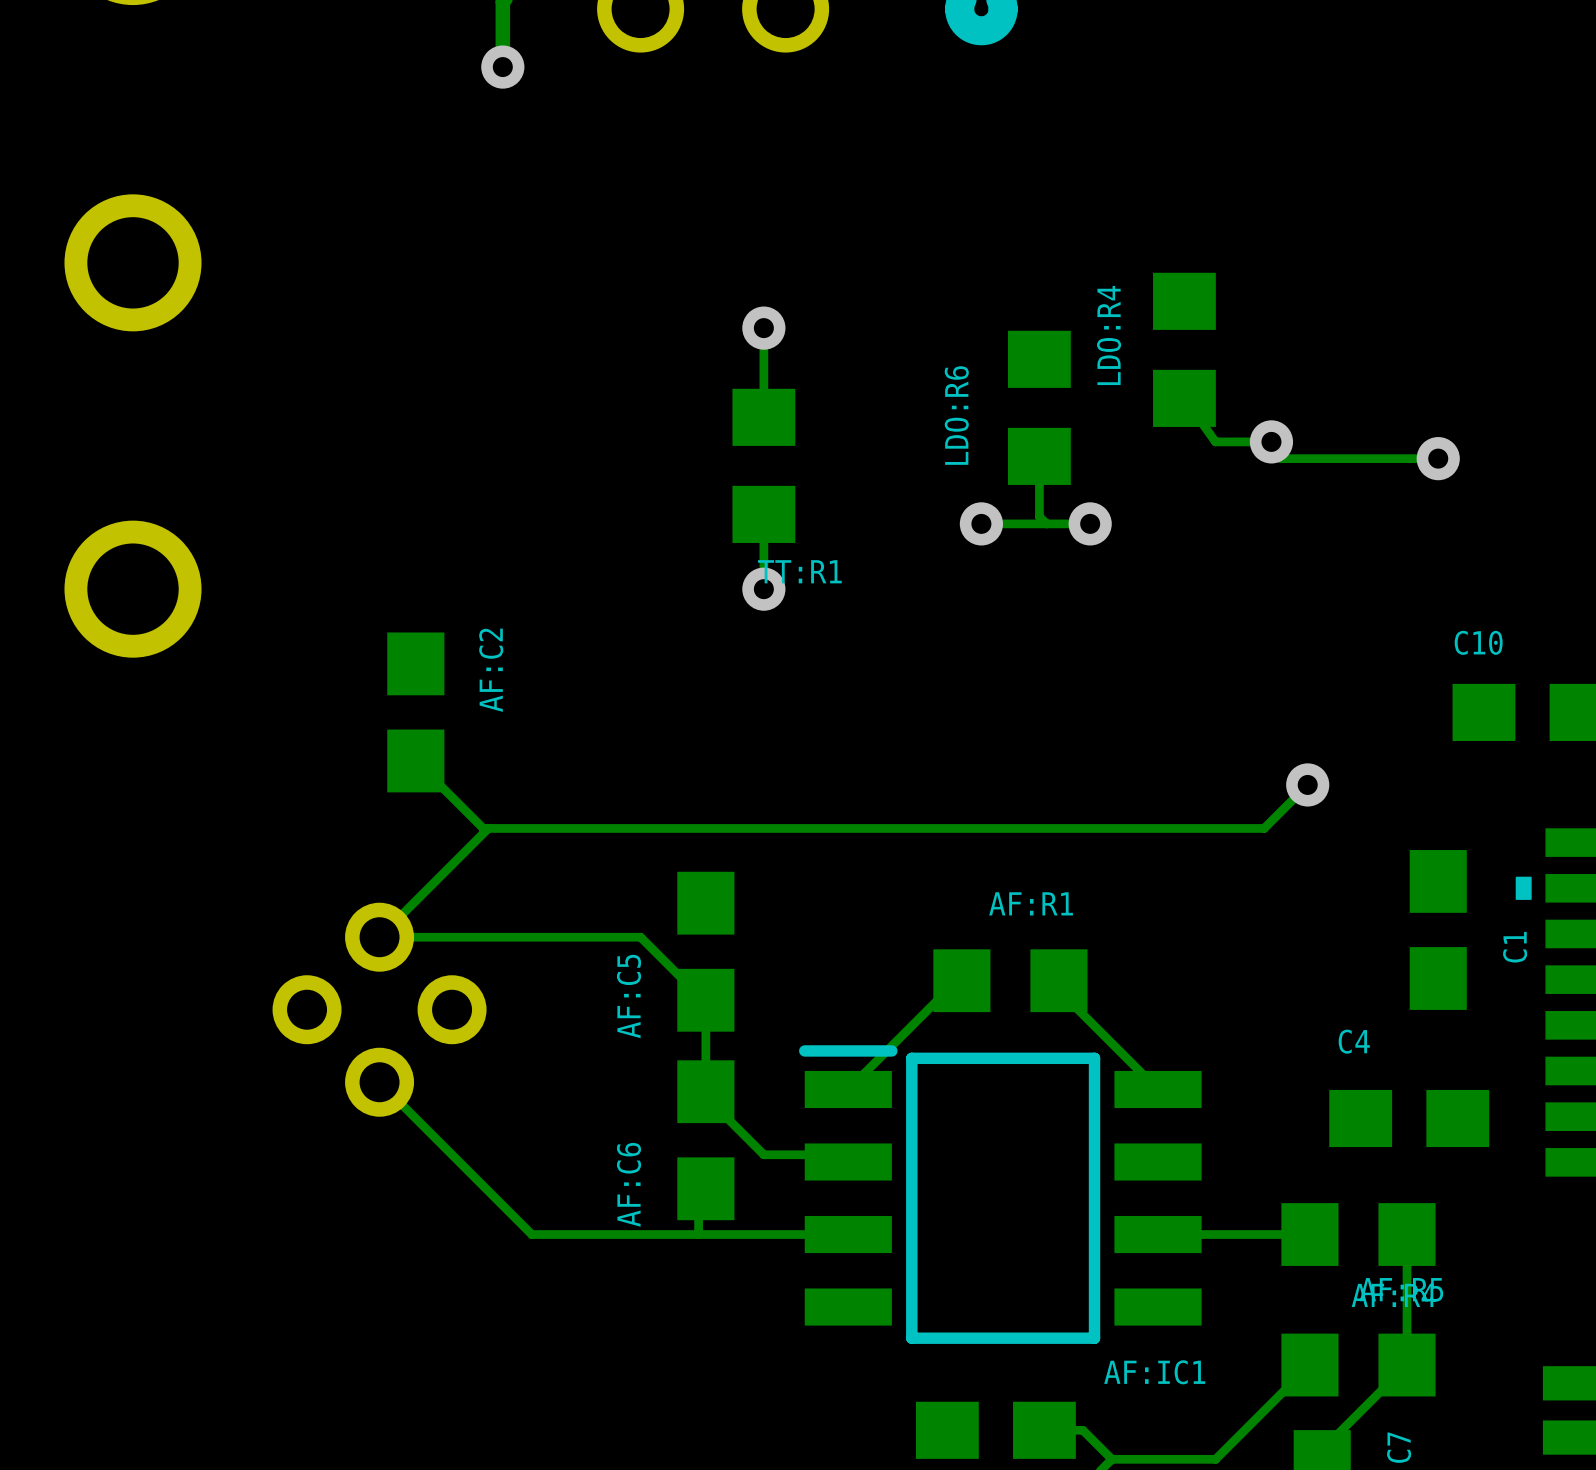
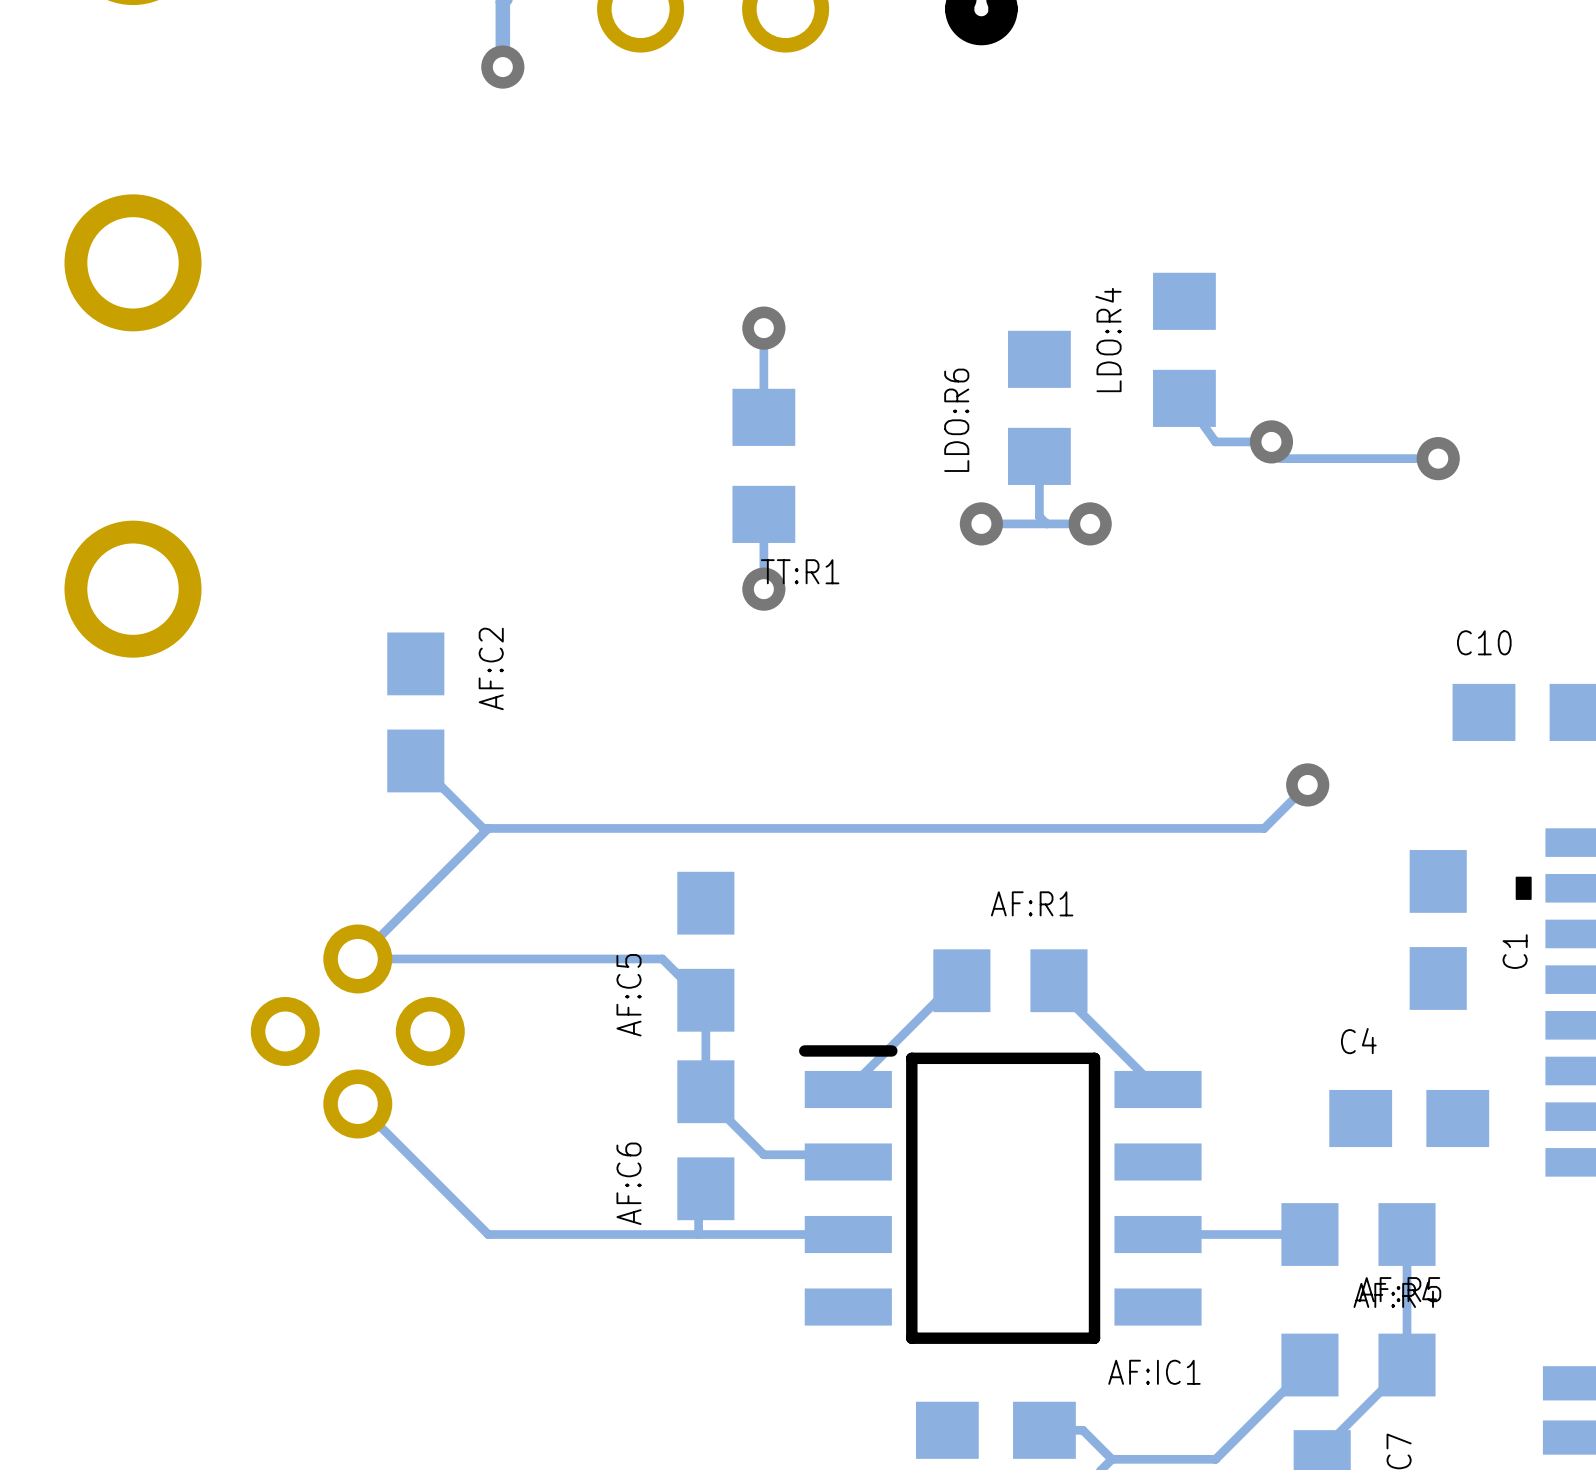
track: (379, 937) (640, 937) (662, 958) -> (379, 937) (357, 958) (662, 958)
part position: (379, 1009) -> (357, 1031)
track: (379, 1082) (531, 1234) -> (357, 1104) (488, 1234) (531, 1234)

